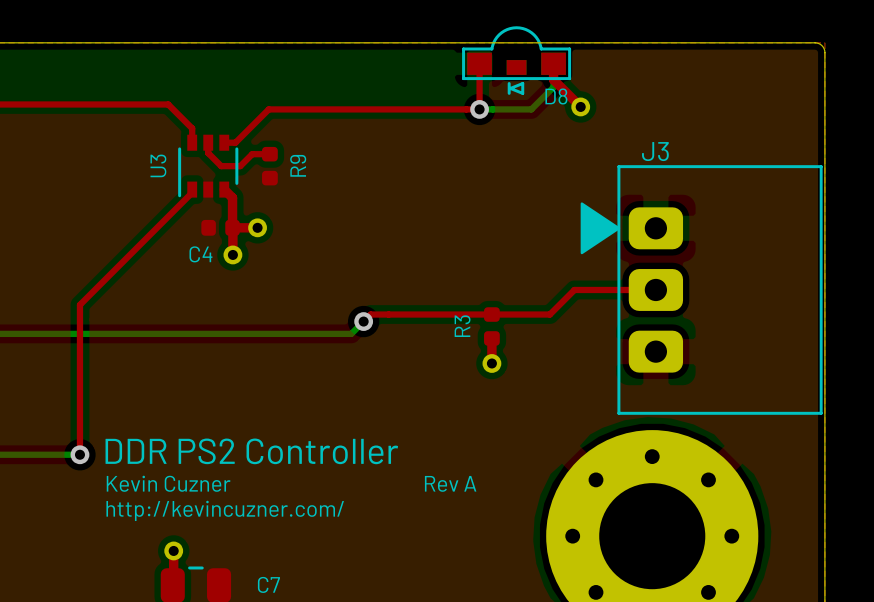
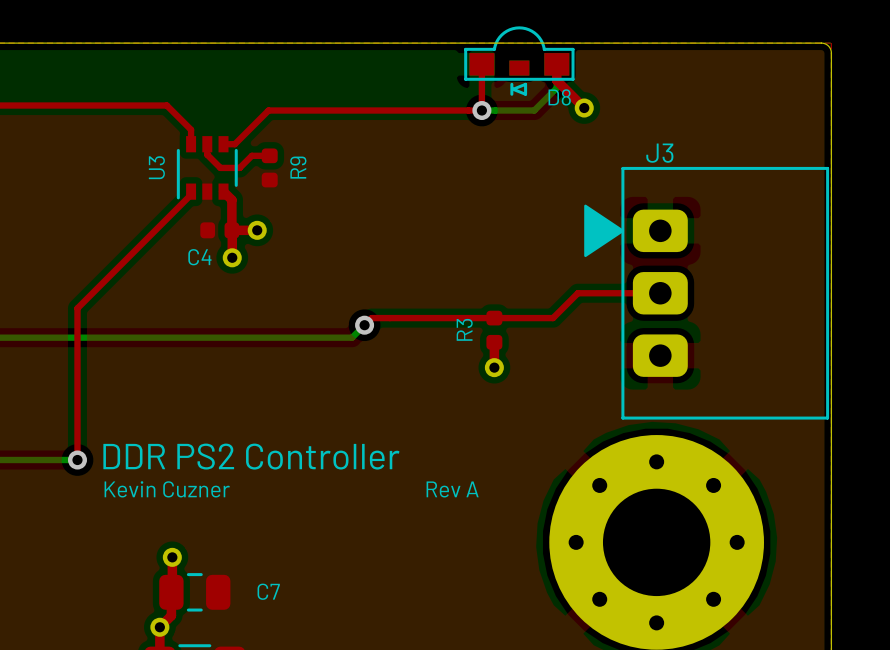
text: http://kevincuzner.com/ (225, 510) -> none

